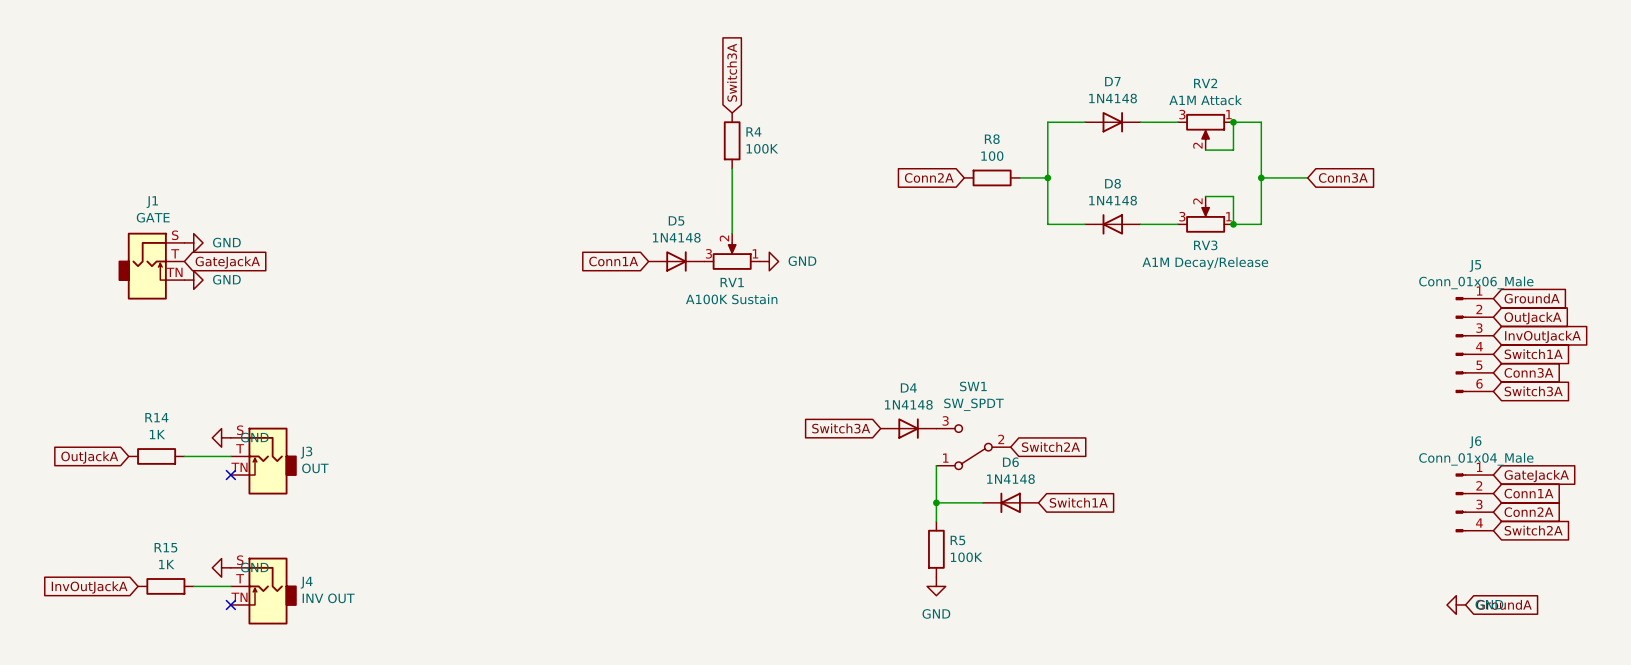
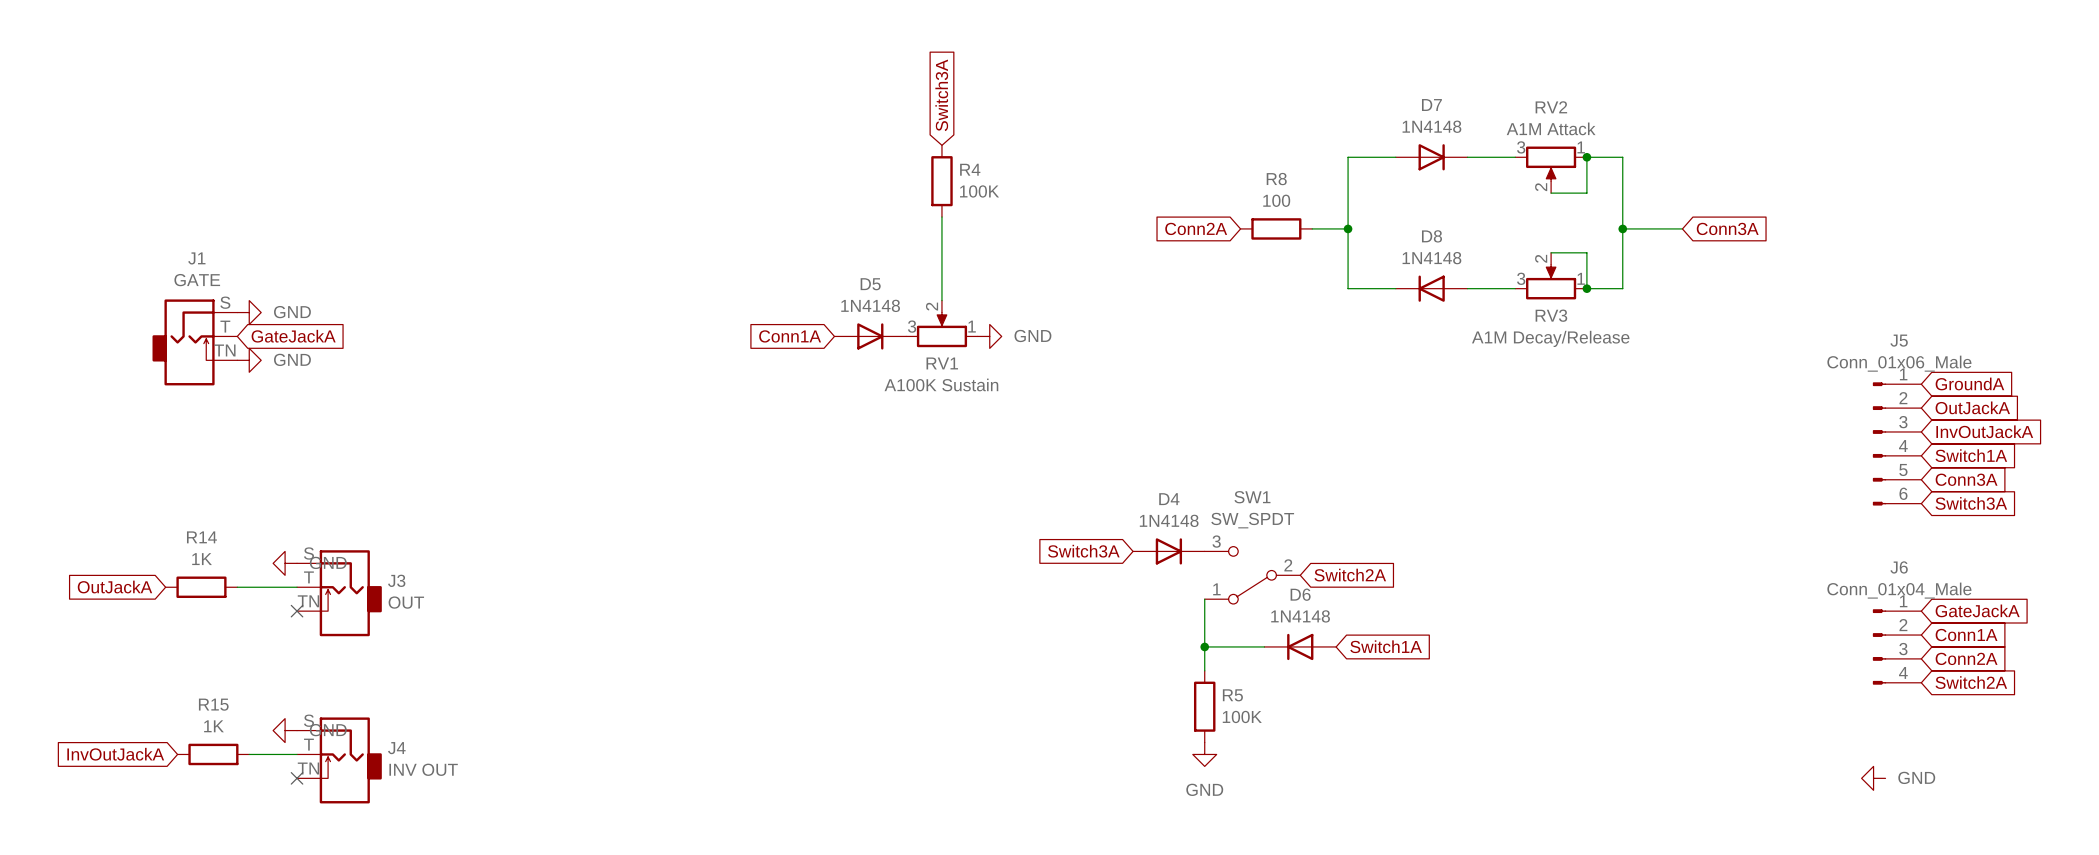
global label: GroundA (1504, 604) -> none

